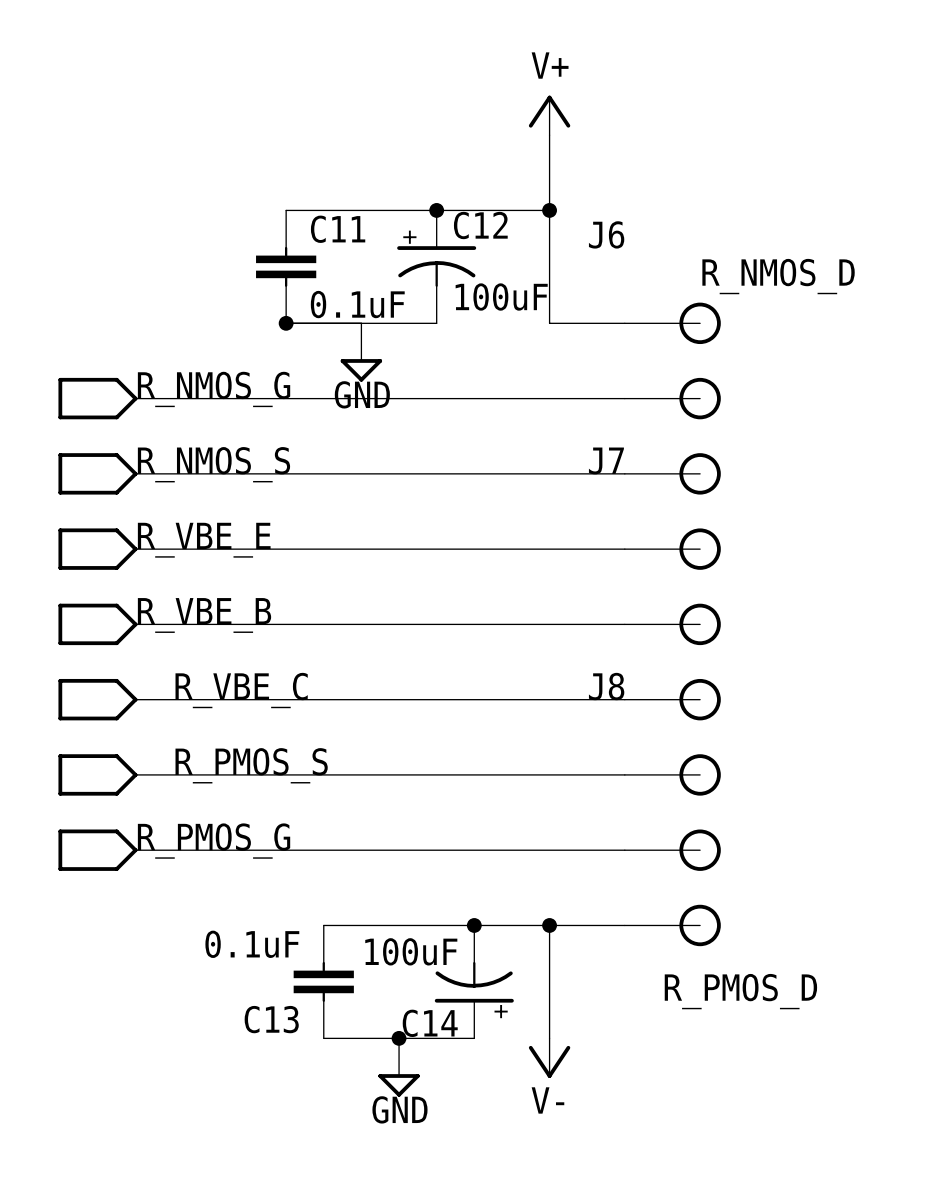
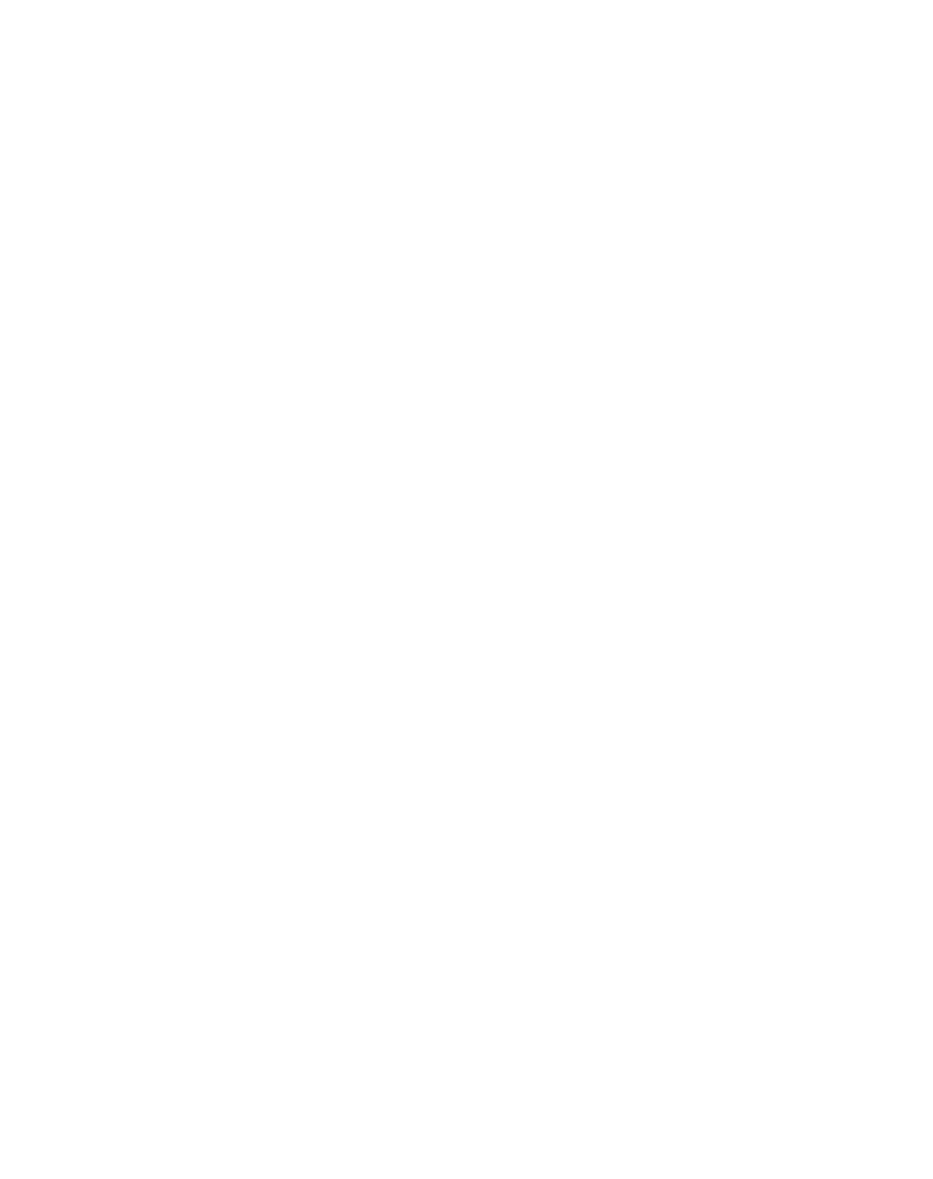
power symbol: V+ (549, 115) -> none
wire: (549, 135) (549, 323) (624, 323) -> none
wire: (286, 210) (549, 210) -> none
junction: (436, 210) -> none
junction: (549, 210) -> none
C11: 0.1uF (286, 266) -> none
C12: 100uF (436, 266) -> none
text: R_NMOS_D (778, 276) -> none
wire: (286, 323) (436, 323) -> none
junction: (286, 323) -> none
power symbol: GND (361, 352) -> none
label: R_NMOS_G (214, 389) -> none
part: (97, 398) -> none
wire: (135, 398) (624, 398) -> none
J6: (672, 398) -> none
label: R_NMOS_S (213, 464) -> none
part: (97, 473) -> none
wire: (135, 473) (624, 473) -> none
label: R_VBE_E (204, 540) -> none
part: (97, 549) -> none
wire: (135, 549) (624, 549) -> none
label: R_VBE_B (204, 615) -> none
part: (97, 624) -> none
wire: (135, 624) (624, 624) -> none
J7: (672, 624) -> none
label: R_VBE_C (241, 690) -> none
part: (97, 699) -> none
wire: (135, 699) (624, 699) -> none
label: R_PMOS_S (251, 765) -> none
part: (97, 774) -> none
wire: (135, 774) (624, 774) -> none
label: R_PMOS_G (214, 841) -> none
part: (97, 850) -> none
wire: (135, 850) (624, 850) -> none
J8: (672, 850) -> none
wire: (323, 925) (624, 925) -> none
junction: (474, 925) -> none
wire: (549, 925) (549, 1038) -> none
junction: (549, 925) -> none
C13: 0.1uF (323, 981) -> none
C14: 100uF (474, 981) -> none
text: R_PMOS_D (740, 991) -> none
wire: (323, 1038) (474, 1038) -> none
junction: (399, 1038) -> none
power symbol: V- (549, 1058) -> none
power symbol: GND (399, 1067) -> none

